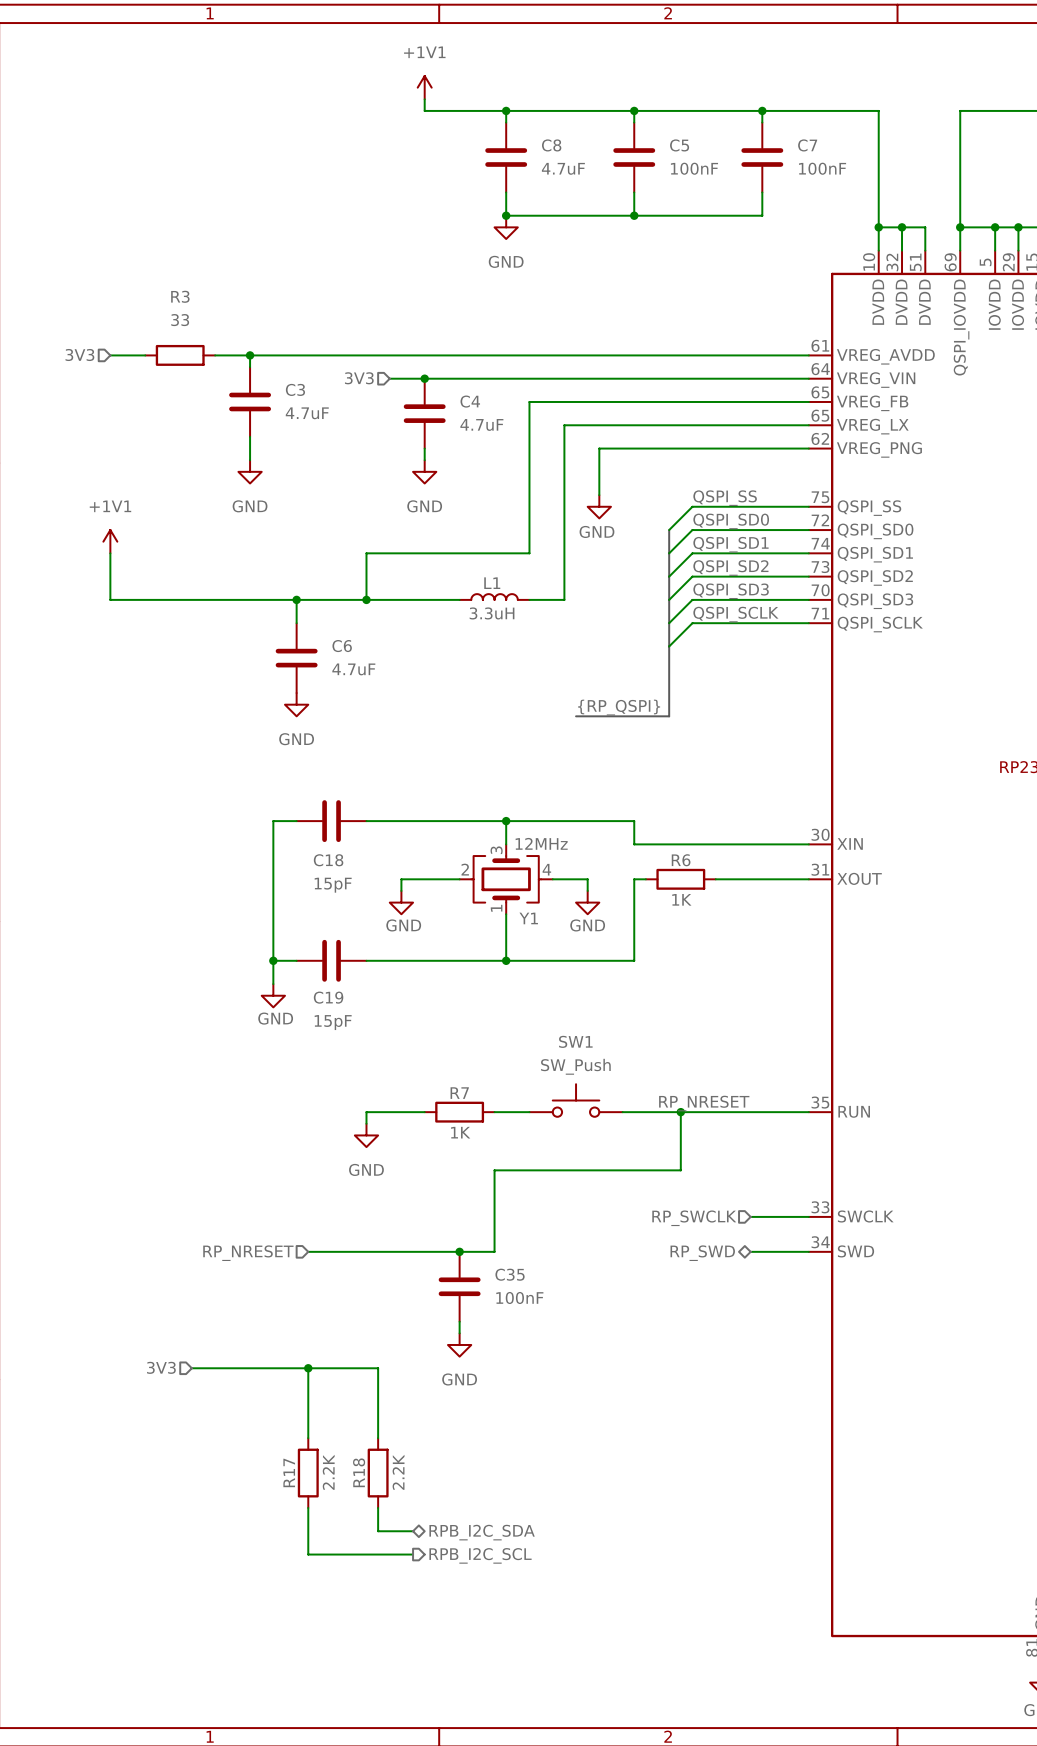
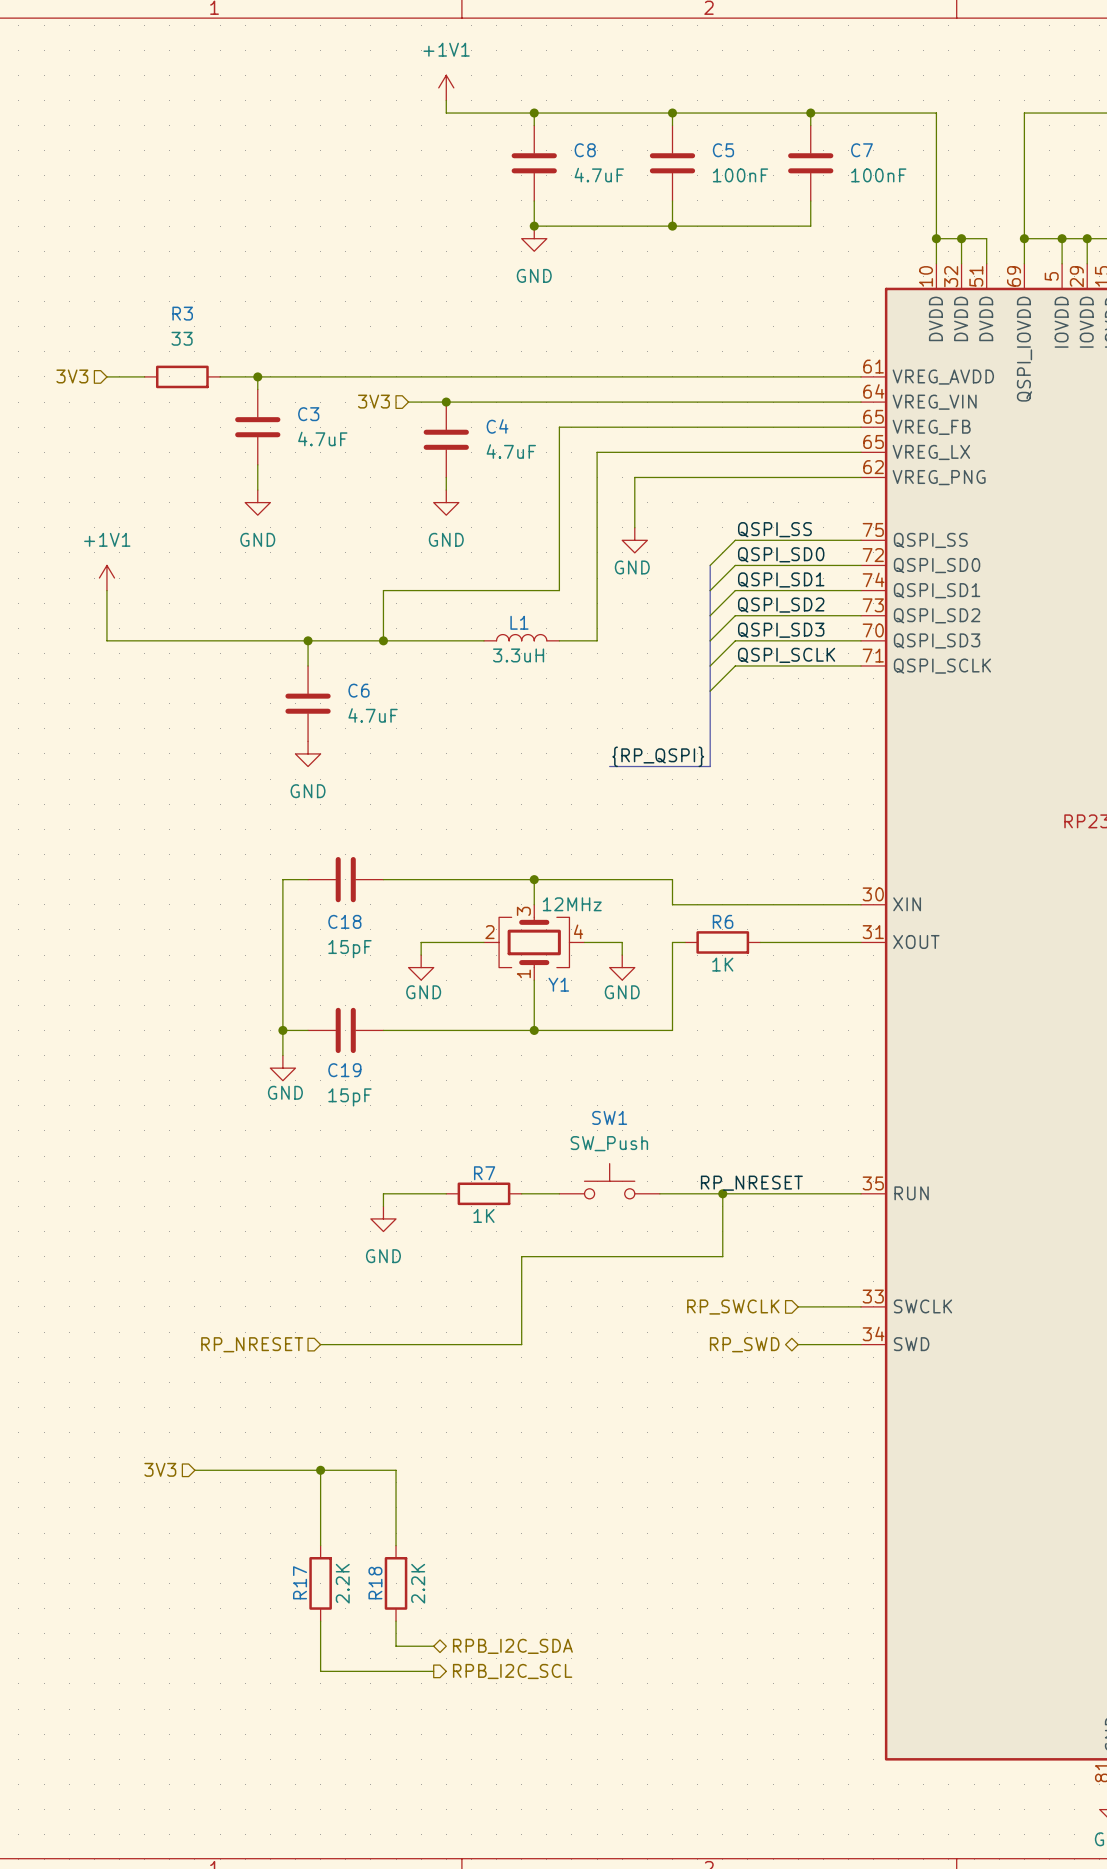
junction: (459, 1251) -> none
C35: 100nF (459, 1286) -> none
wire: (459, 1321) (459, 1333) -> none
power symbol: GND (459, 1344) -> none

